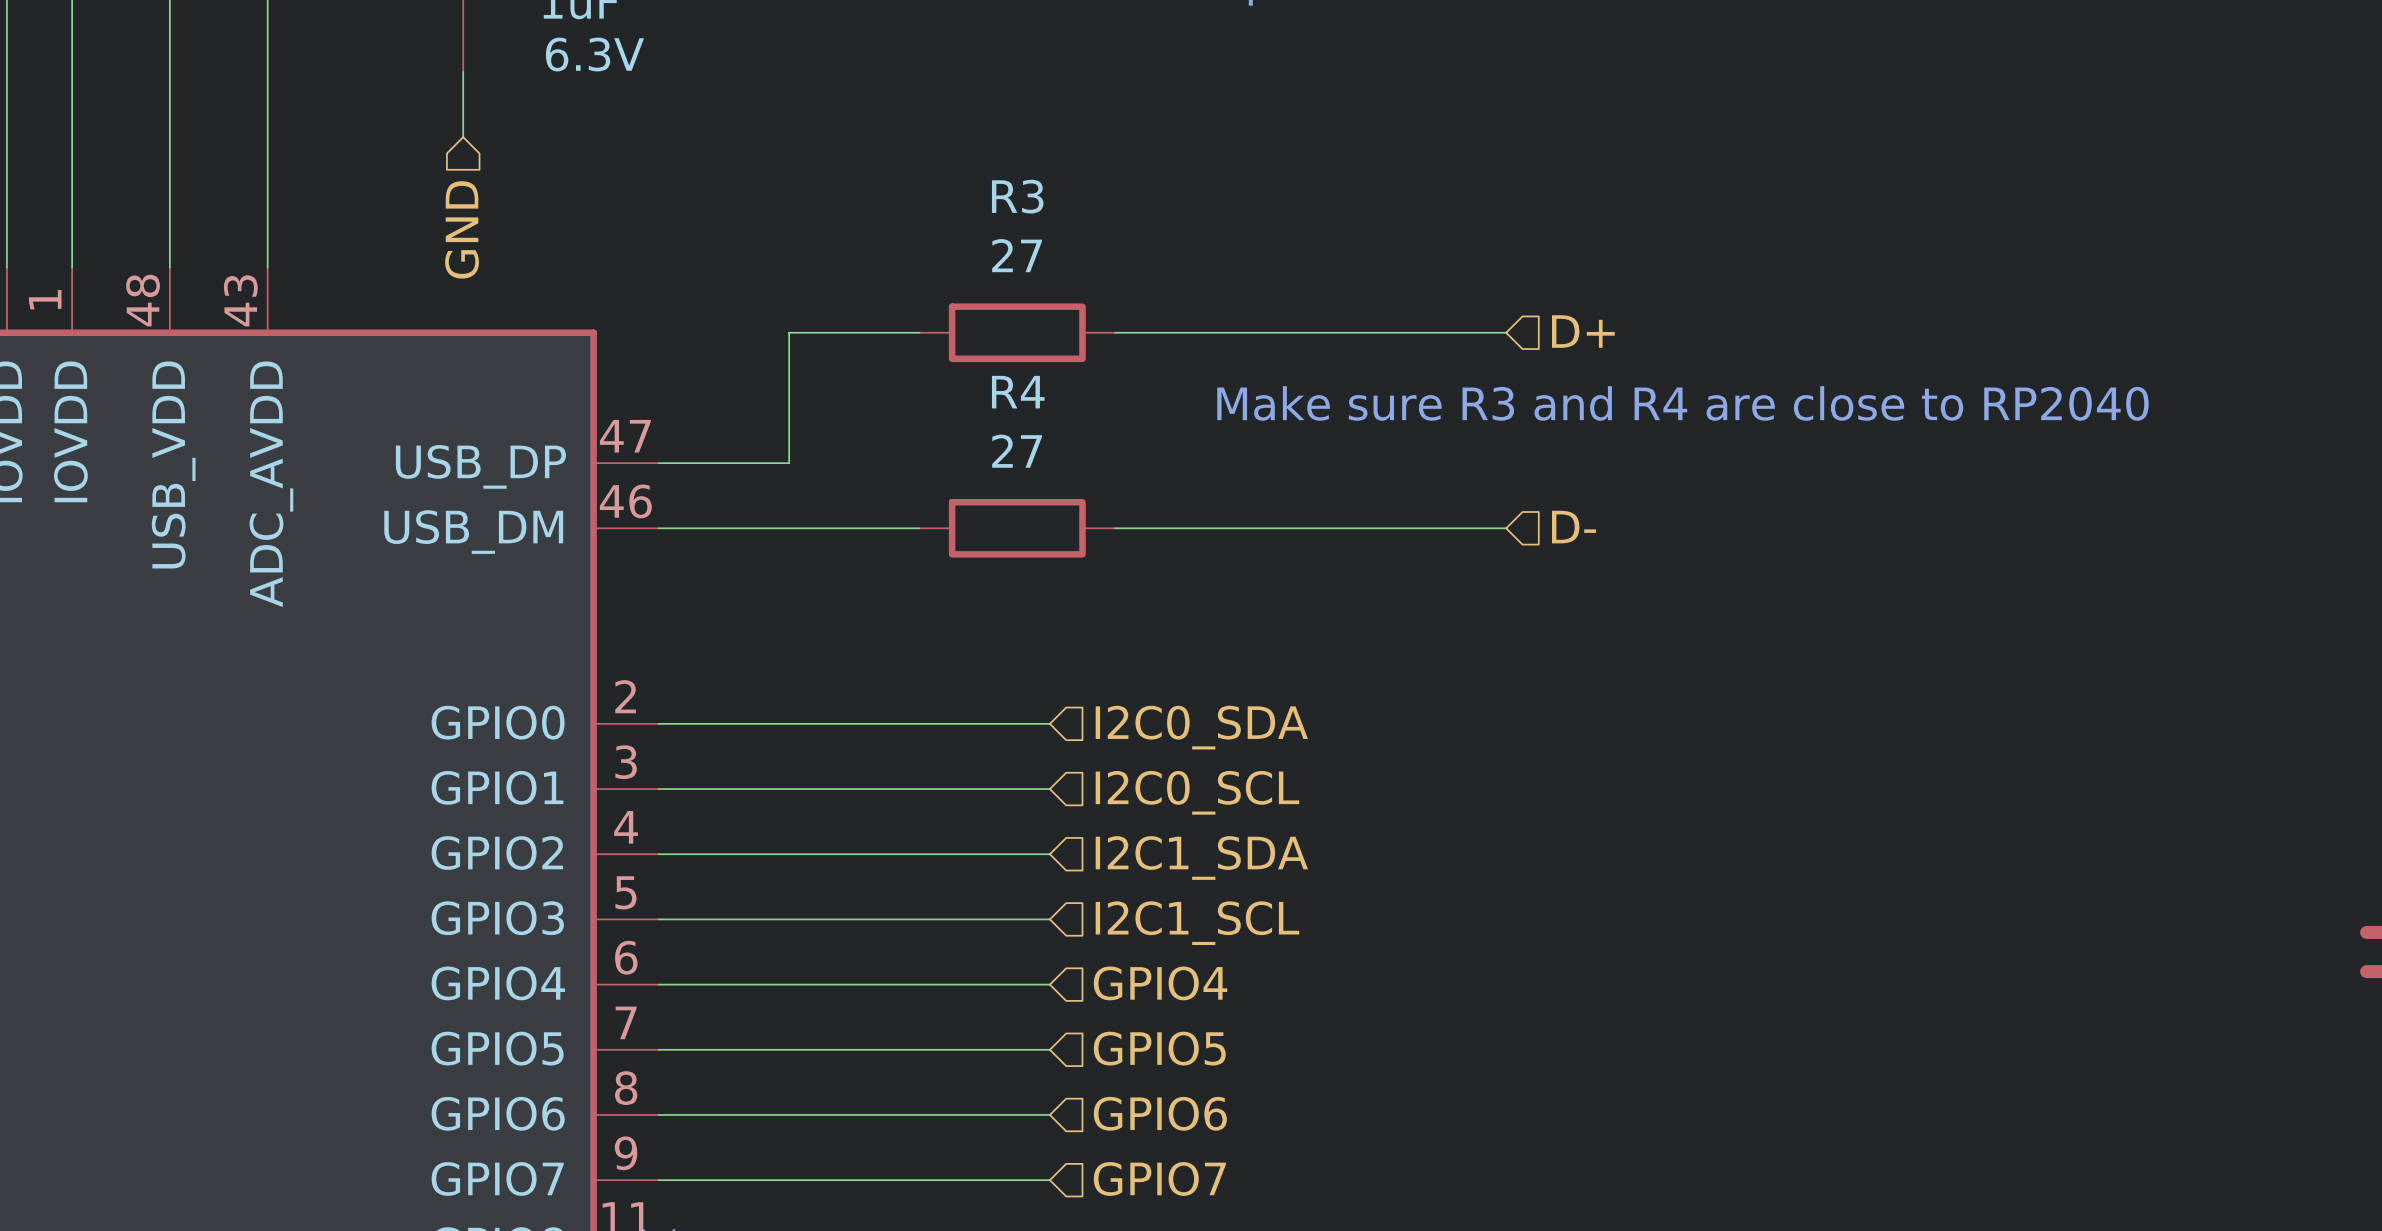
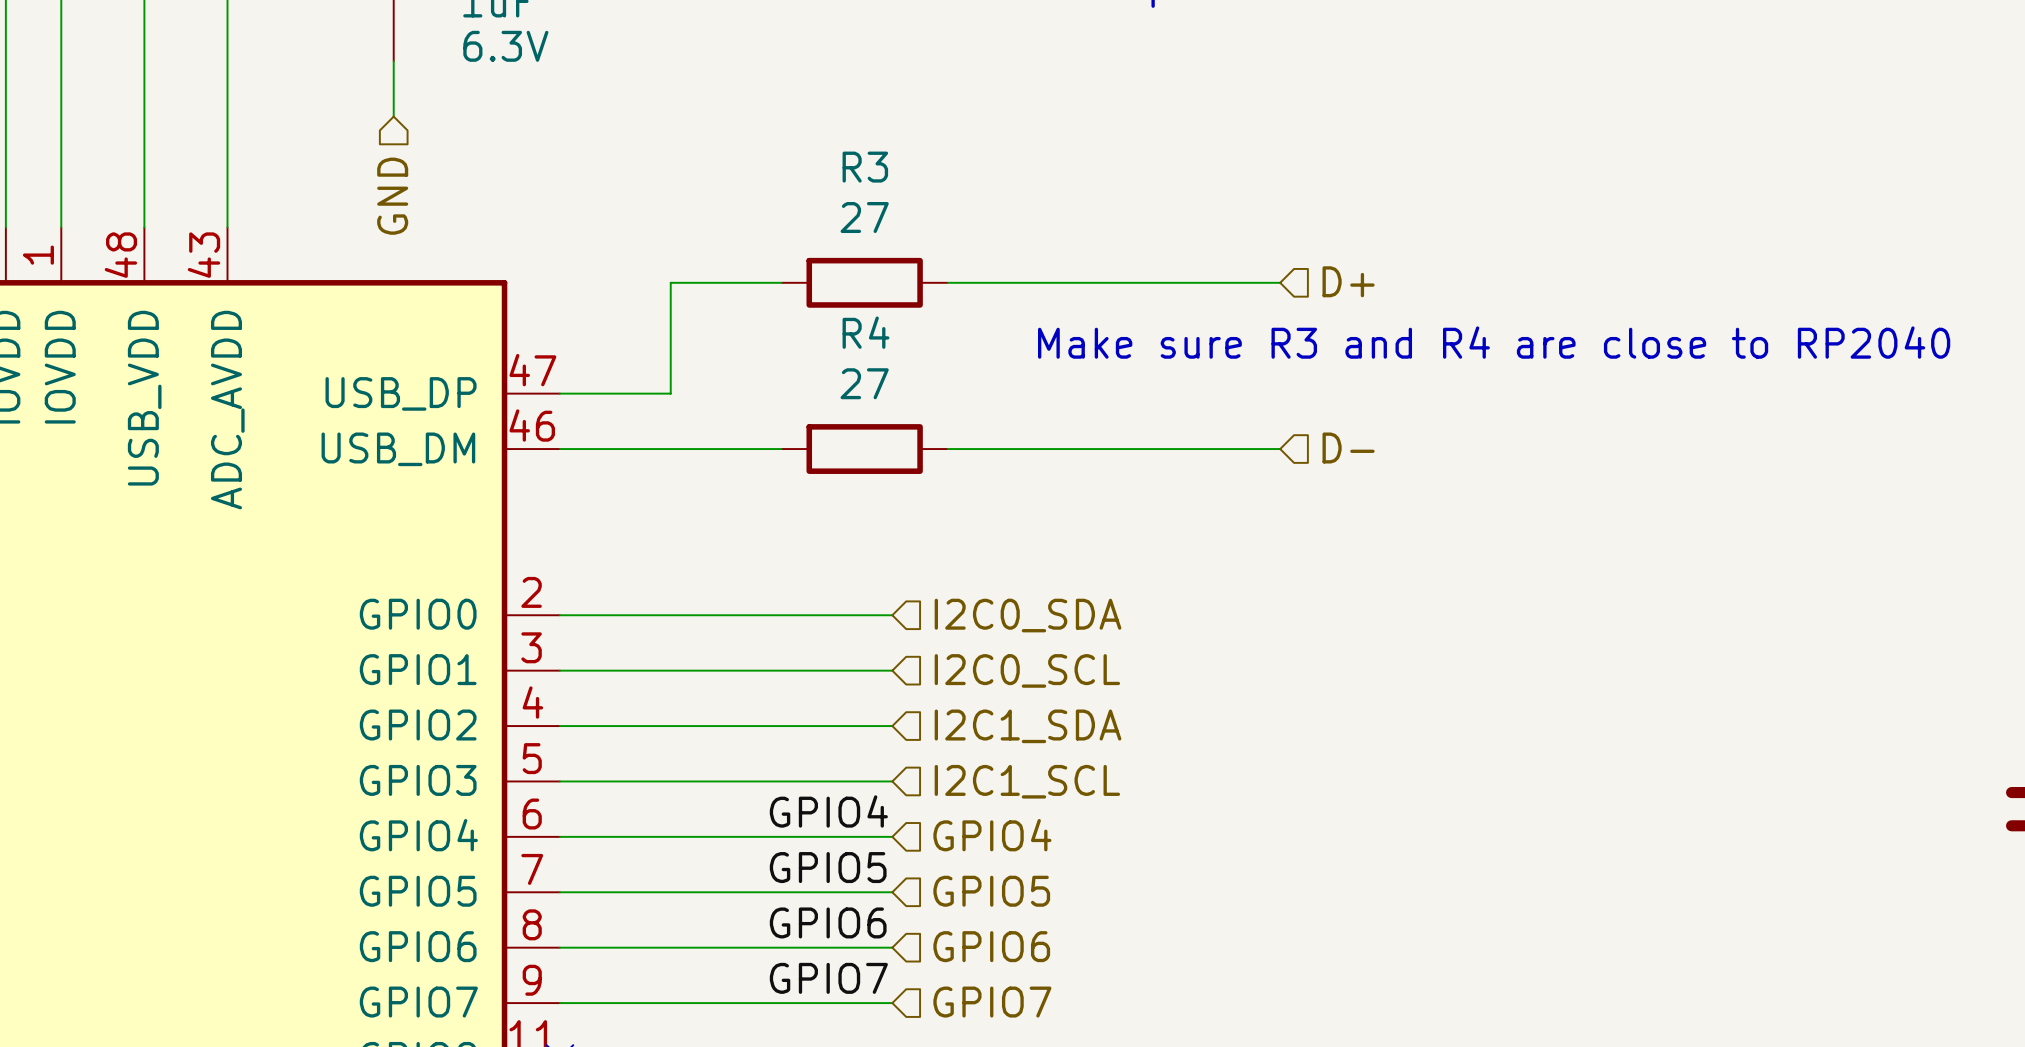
label: none -> GPIO4 (828, 811)
label: none -> GPIO5 (828, 867)
label: none -> GPIO6 (828, 922)
label: none -> GPIO7 (828, 978)

